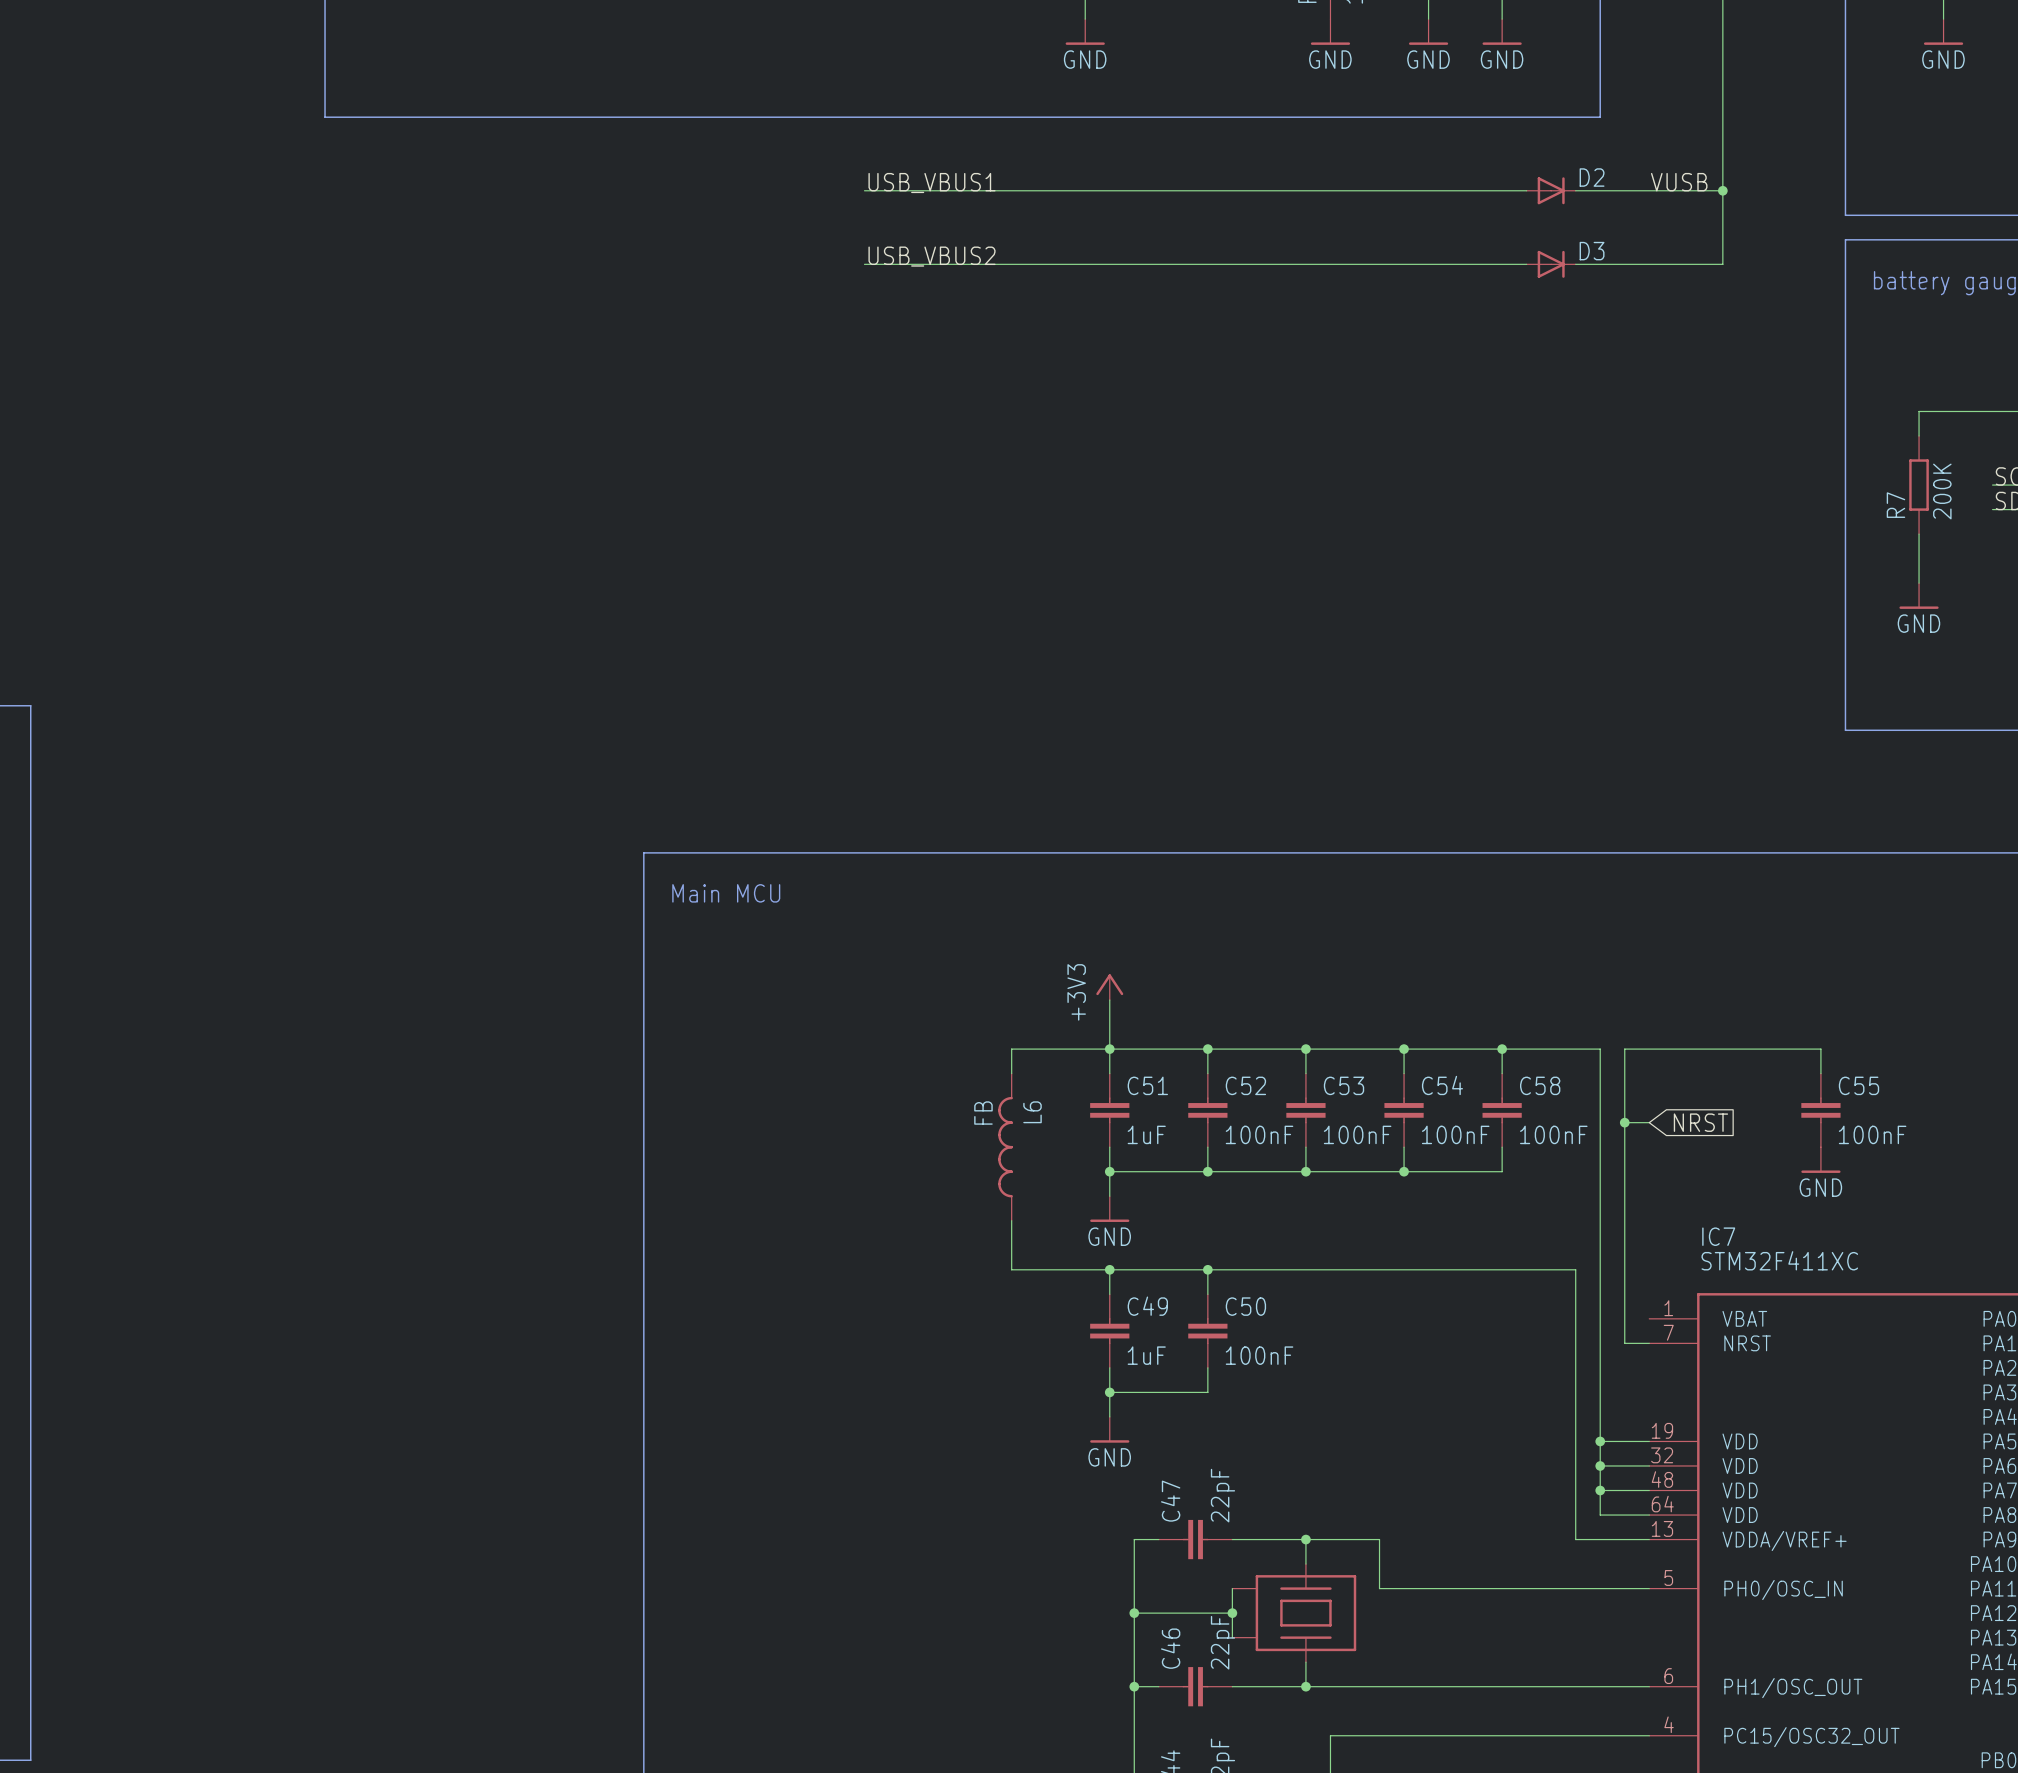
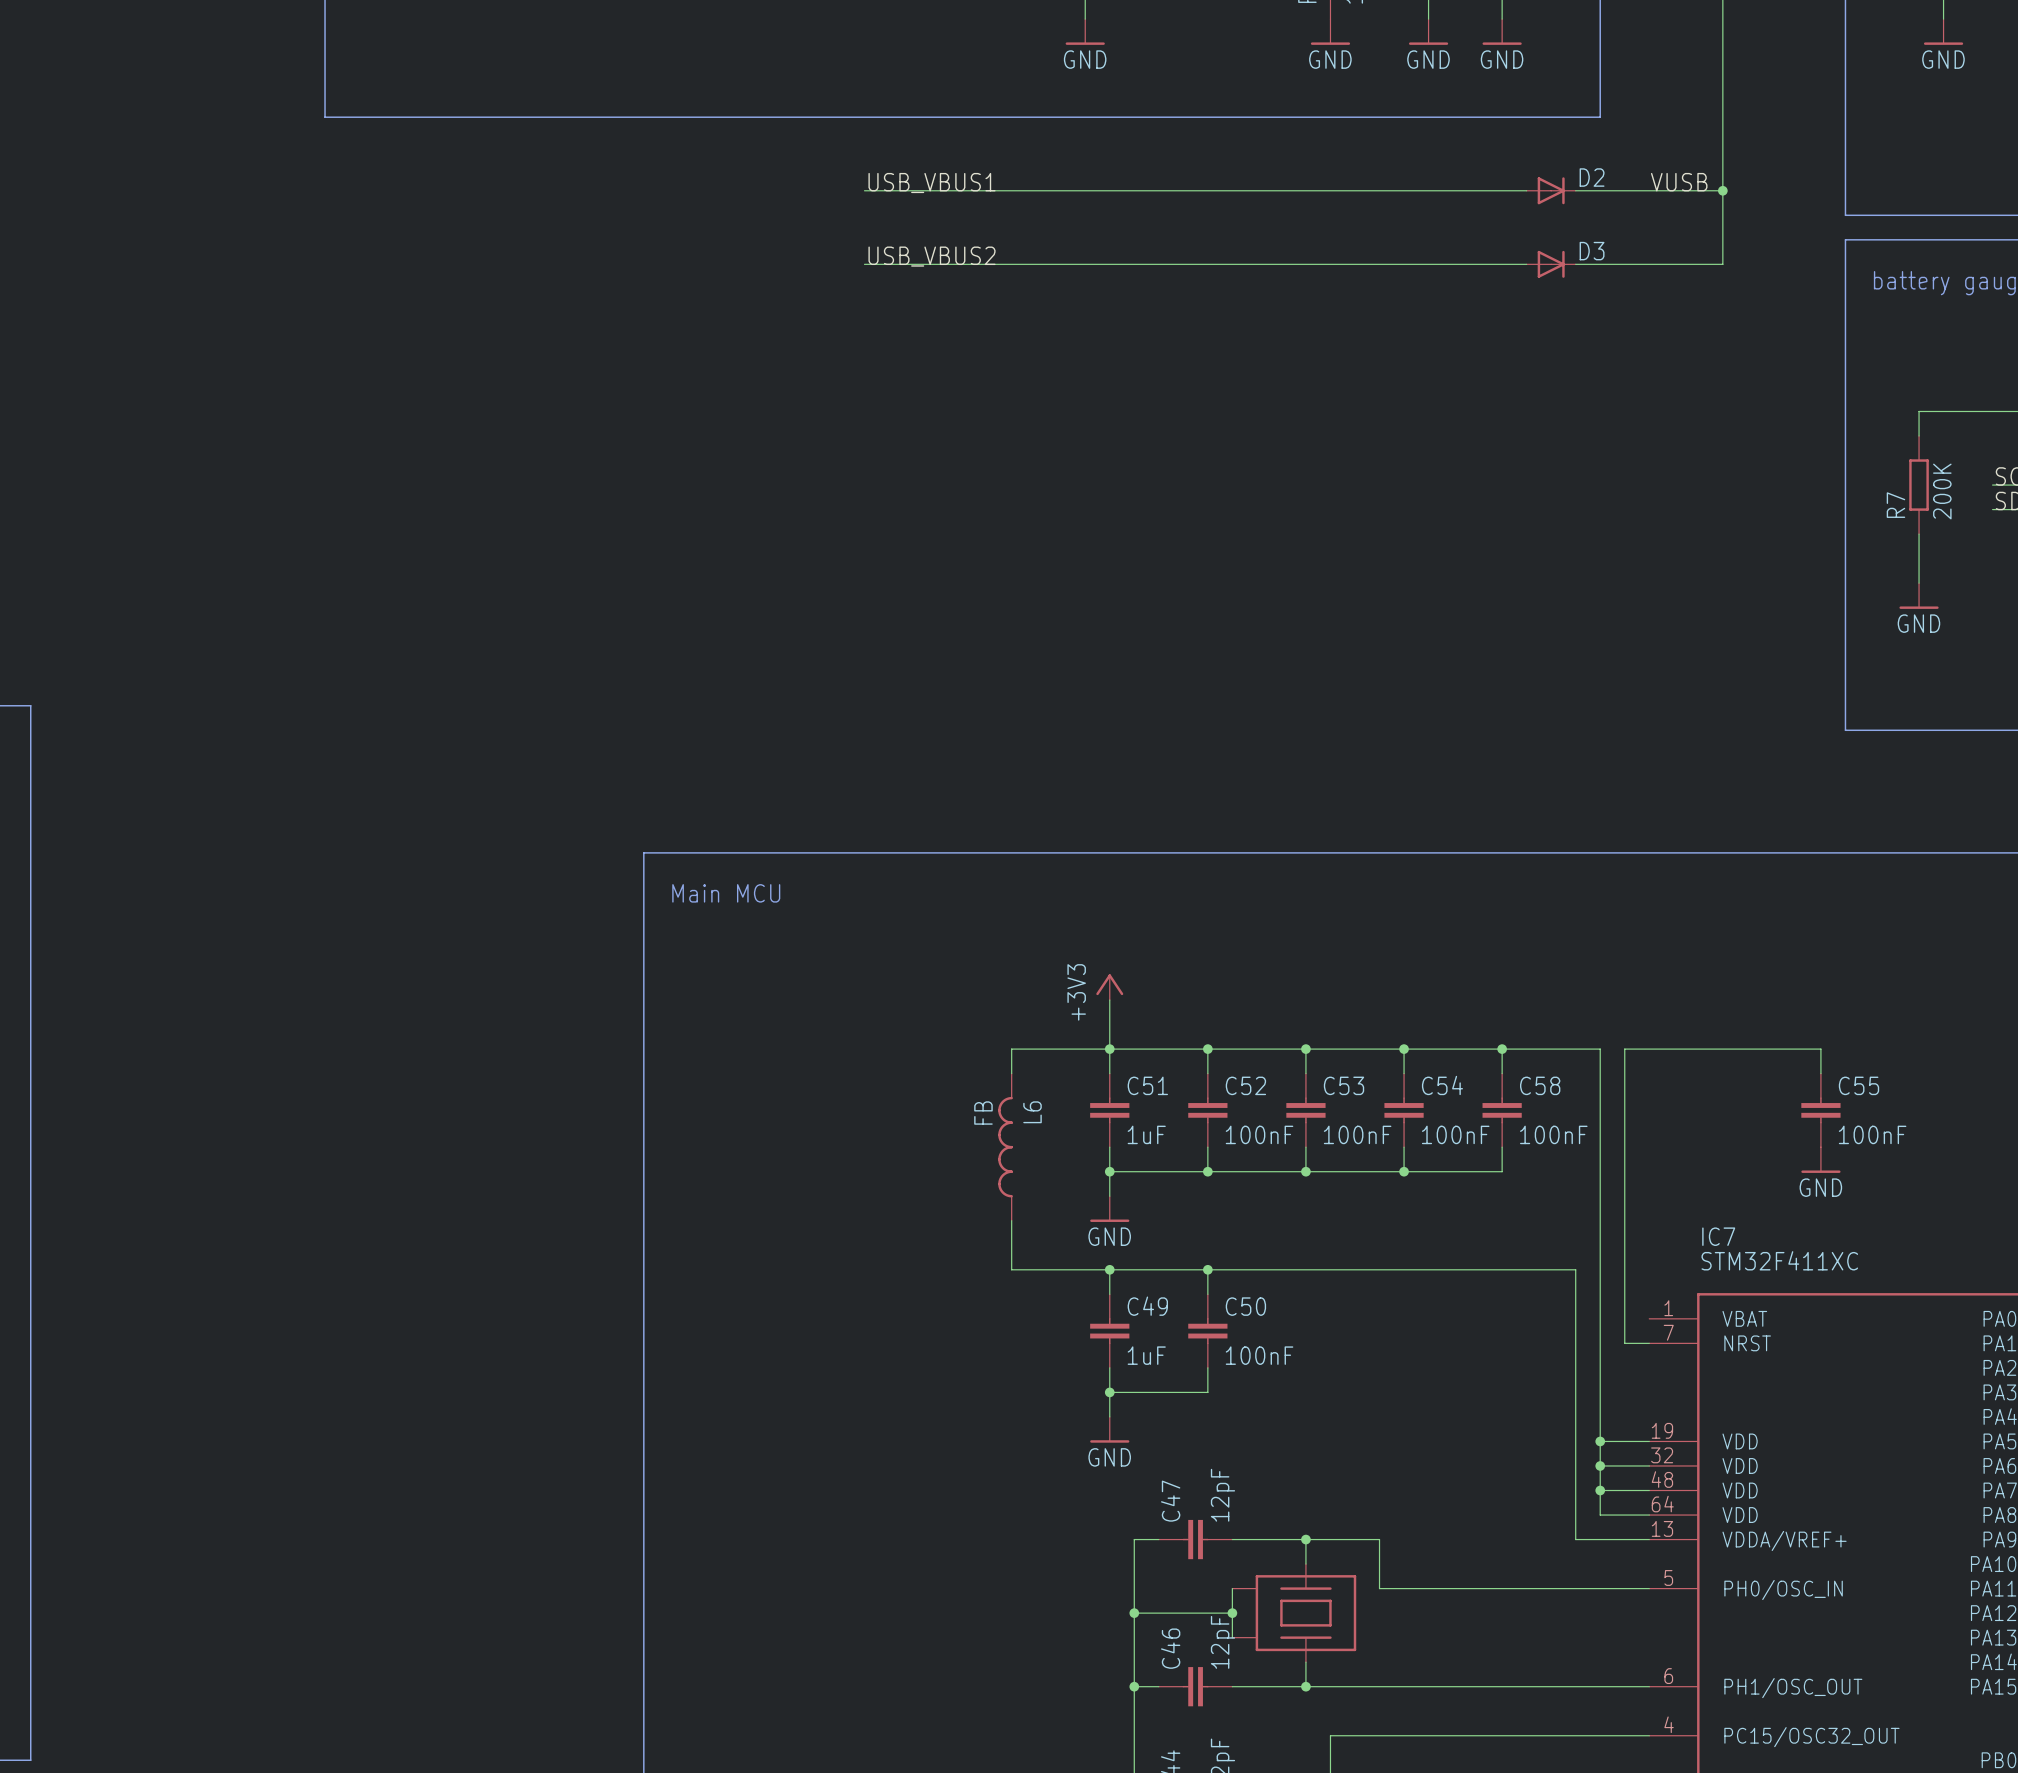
wire: (1624, 1122) (1649, 1122) -> none
junction: (1624, 1122) -> none
global label: NRST (1700, 1122) -> none
C47 value: 22pF (1222, 1495) -> 12pF (1222, 1495)
C46 value: 22pF (1222, 1642) -> 12pF (1222, 1642)

